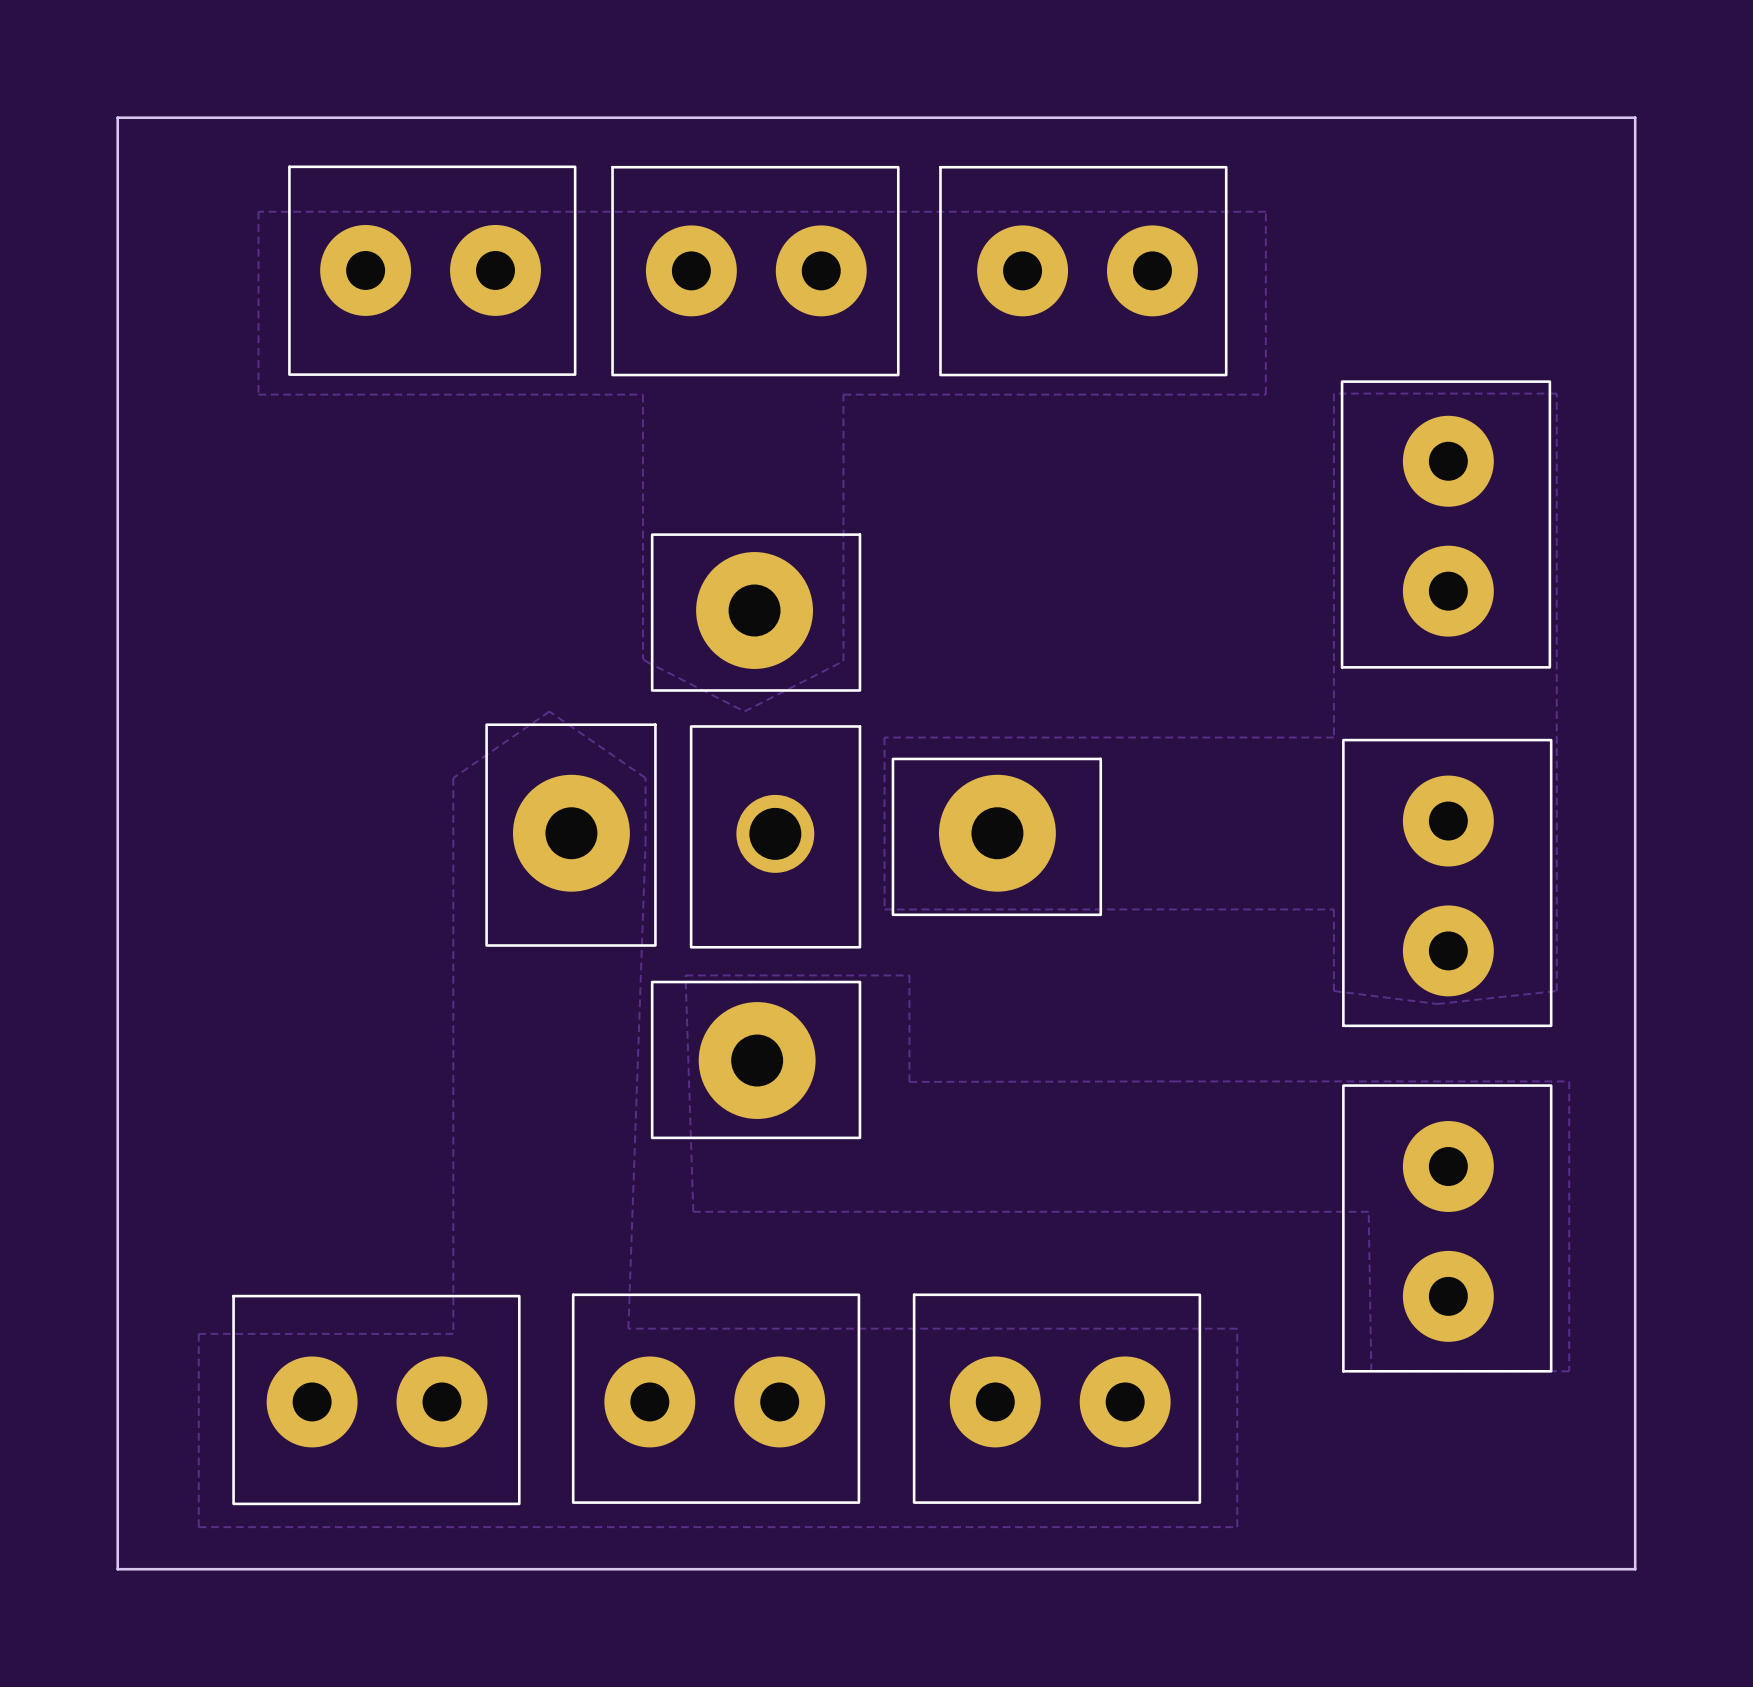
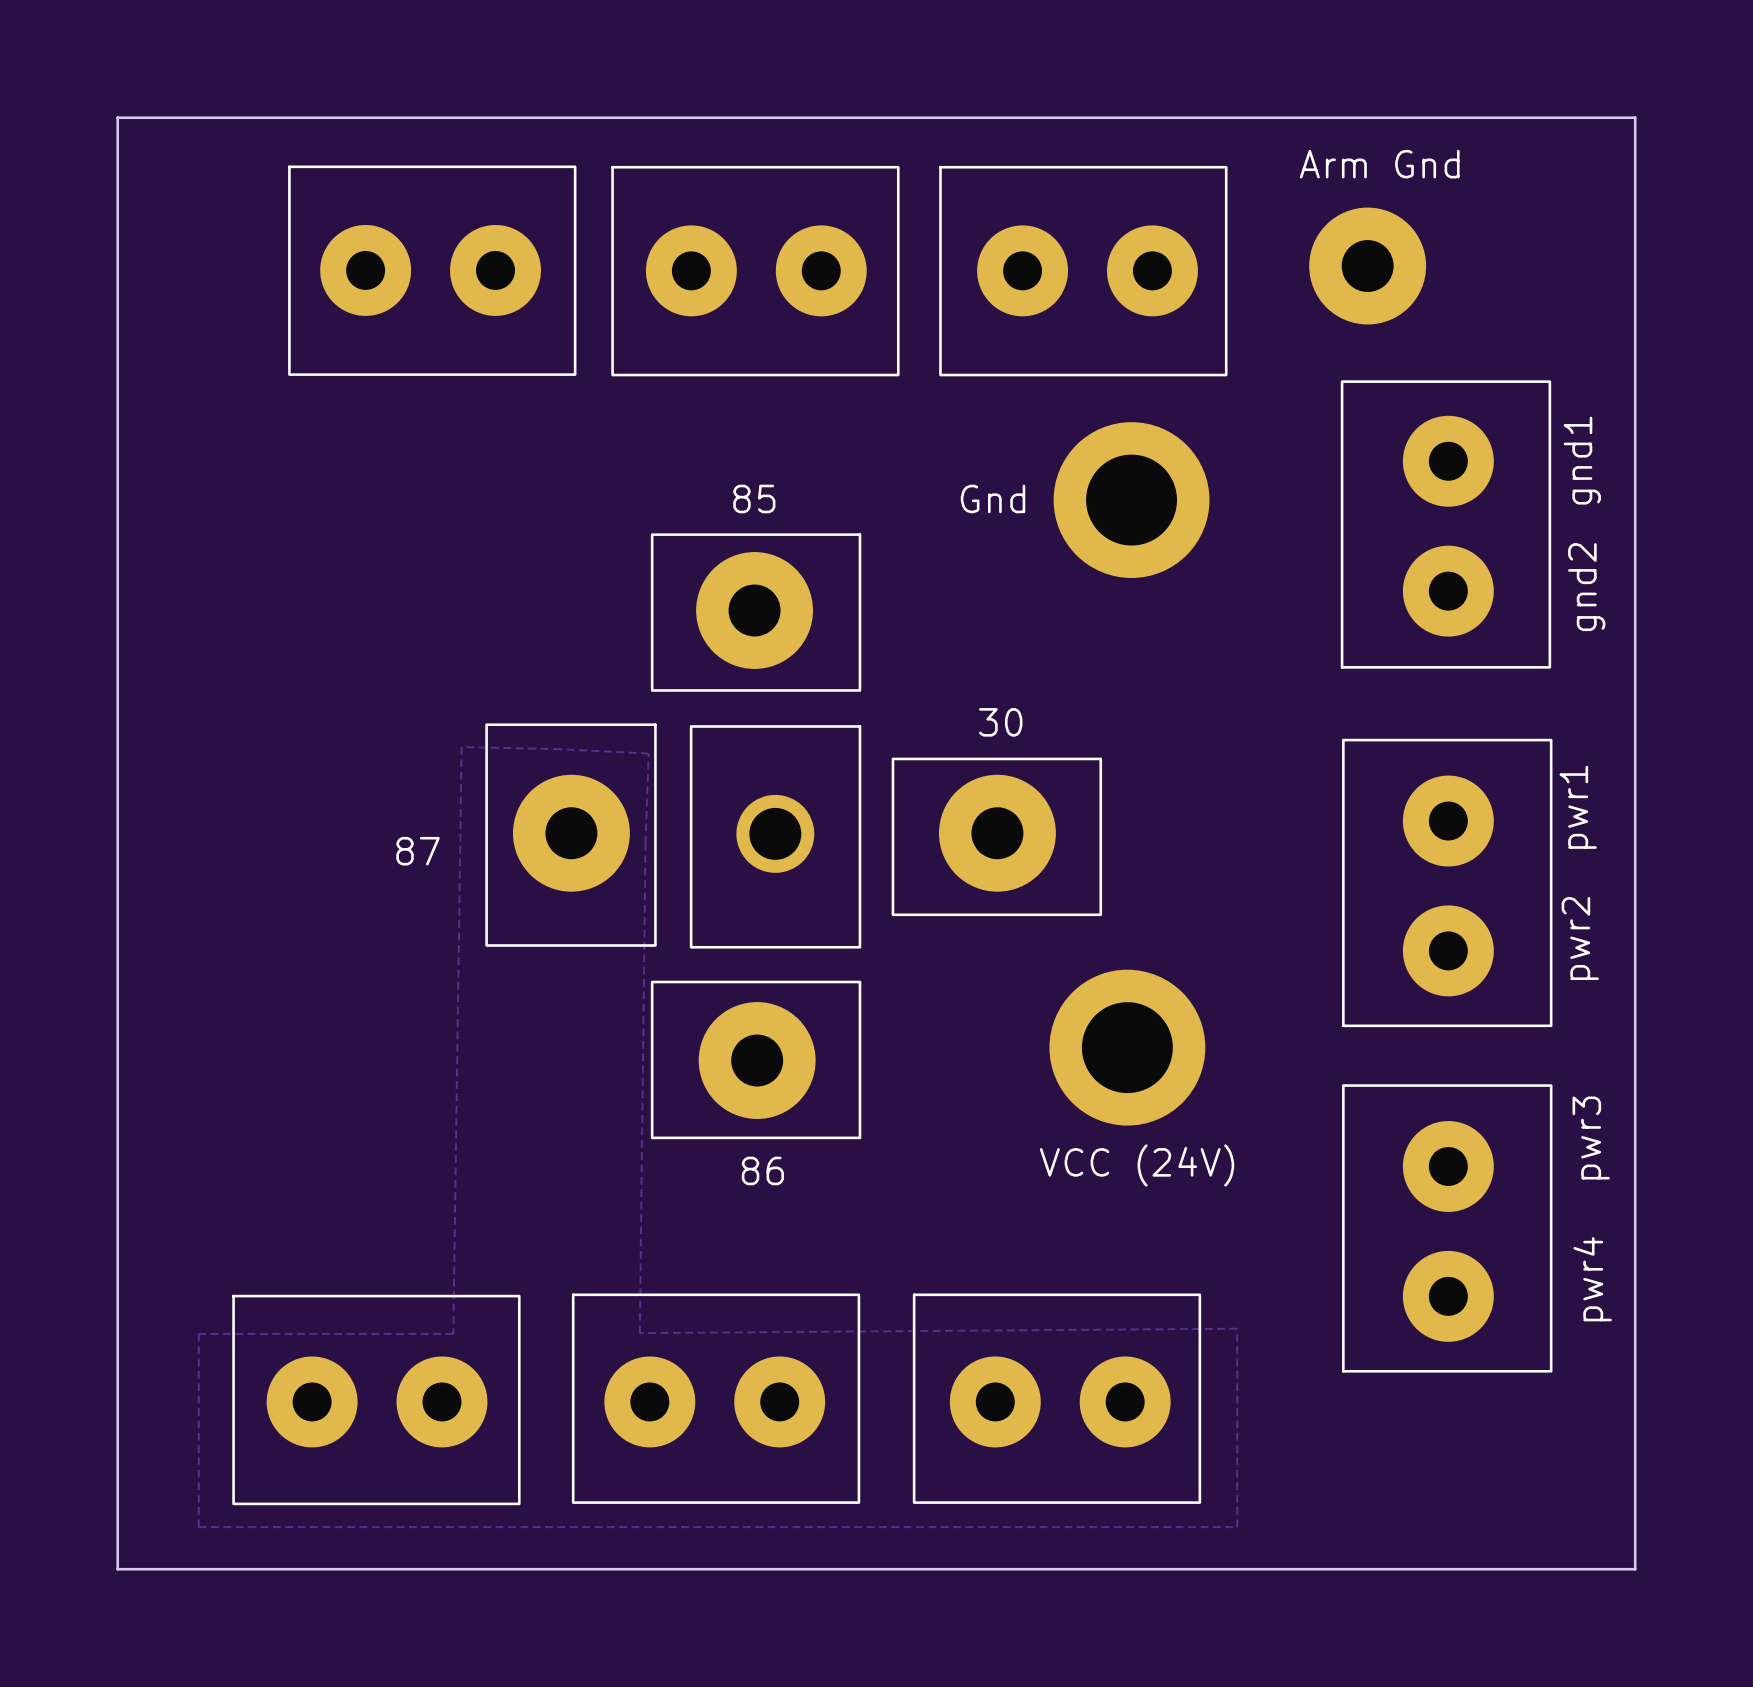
text: none -> Arm Gnd (1379, 164)
zone outline: (258, 211) (1265, 211) (1265, 394) (843, 394) (843, 661) (744, 711) (642, 658) (642, 394) (258, 394) (258, 211) -> none
part: none -> (1367, 266)
zone outline: (1333, 393) (1333, 737) (884, 737) (884, 909) (1333, 909) (1333, 991) (1437, 1004) (1556, 991) (1556, 393) (1333, 393) -> none
text: none -> gnd1 (1582, 460)
text: none -> 85 (754, 498)
text: none -> Gnd (993, 498)
part: none -> (1131, 500)
text: none -> gnd2 (1586, 587)
text: none -> 30 (1000, 722)
text: none -> pwr1 (1578, 807)
text: none -> 87 (418, 851)
text: none -> pwr2 (1580, 938)
zone outline: (685, 975) (693, 1211) (1368, 1211) (1371, 1371) (1569, 1371) (1569, 1081) (909, 1081) (909, 975) (685, 975) -> none
part: none -> (1127, 1047)
text: none -> pwr3 (1591, 1137)
text: none -> VCC (24V) (1137, 1165)
text: none -> 86 (762, 1170)
text: none -> pwr4 (1592, 1279)
zone outline: (1237, 1328) (628, 1328) (645, 843) (645, 778) (549, 711) (453, 778) (453, 1333) -> (1237, 1328) (639, 1333) (645, 843) (648, 753) (461, 747) (453, 1333)

